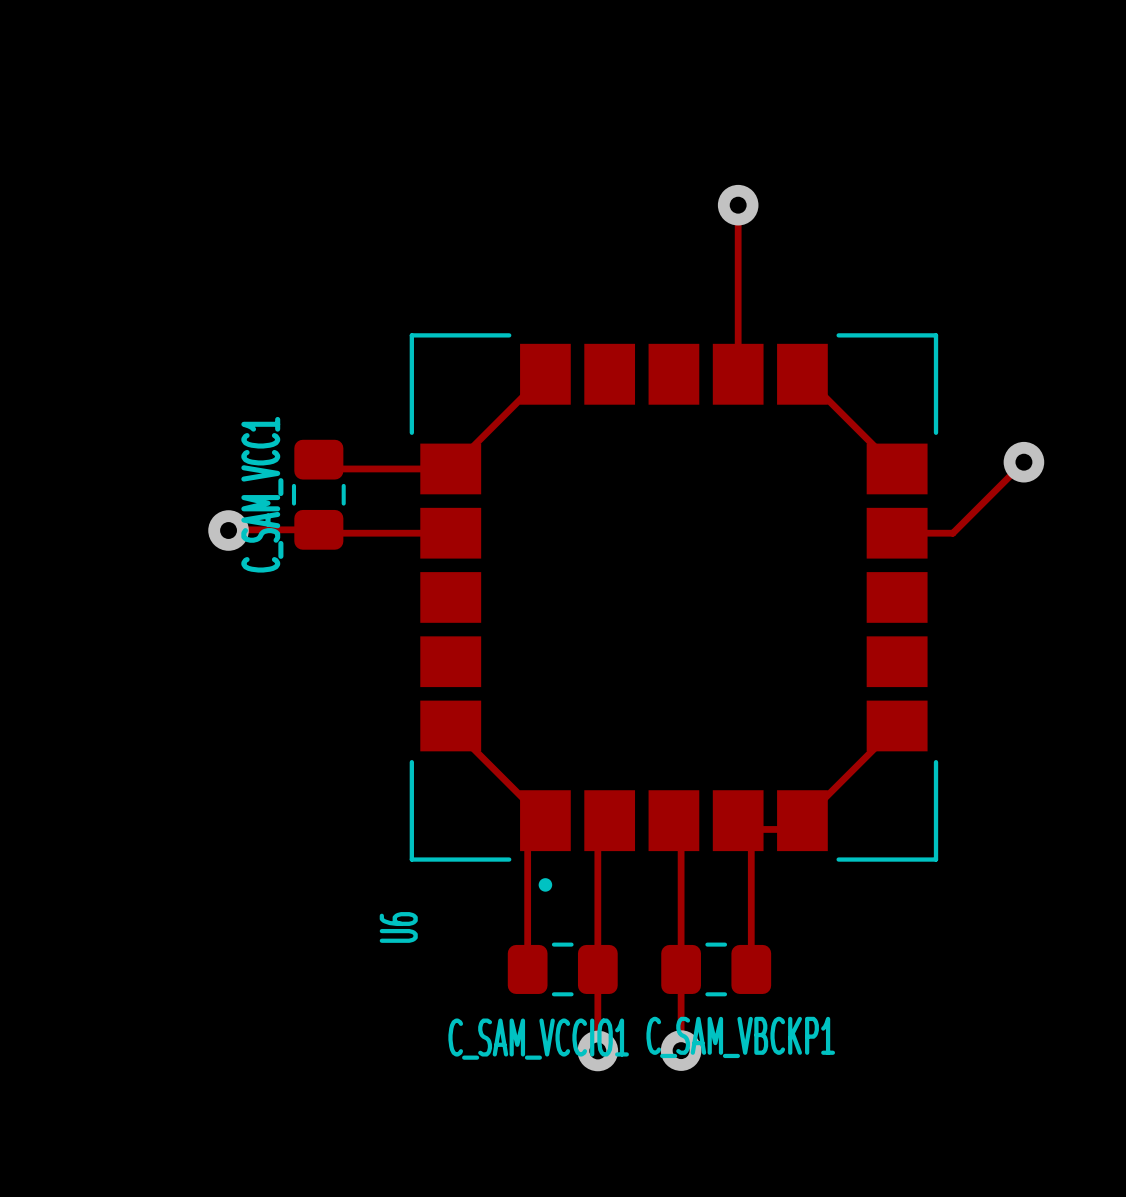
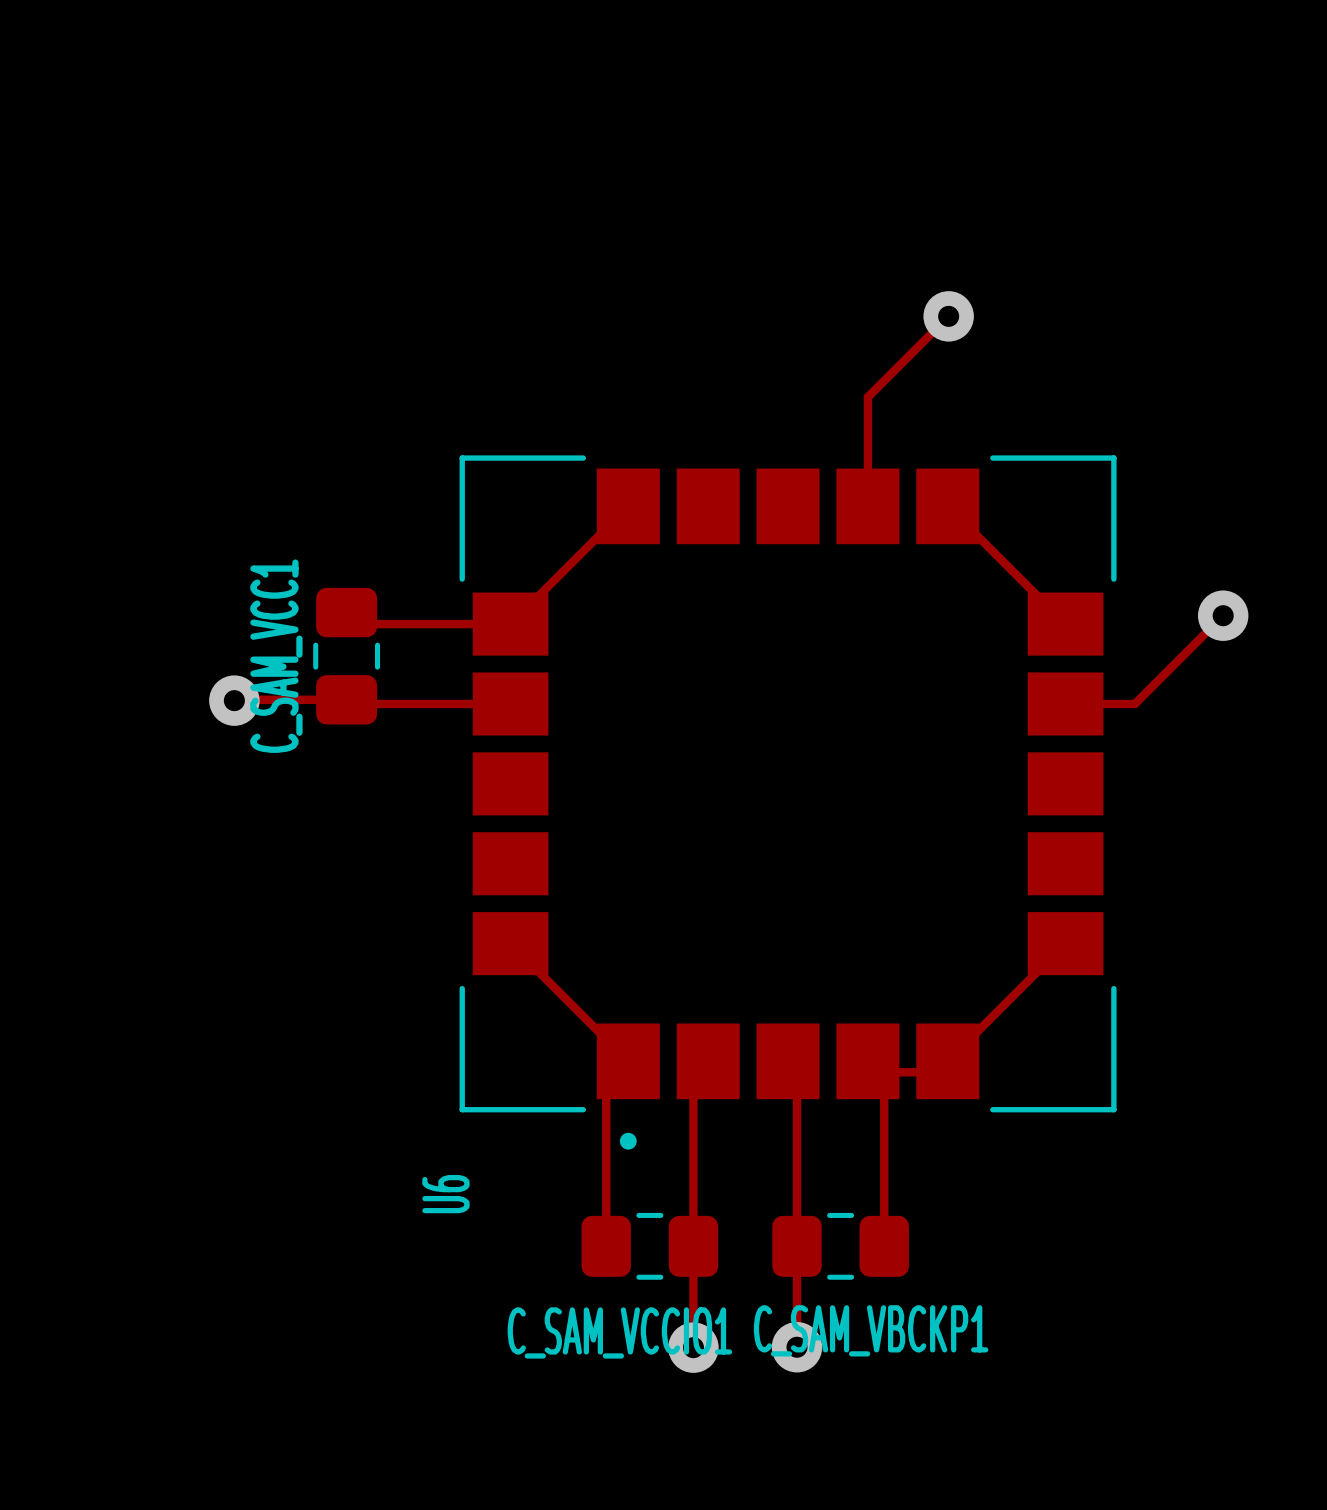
track: (738, 205) (738, 286) -> (948, 316) (867, 397)
via position: (738, 205) -> (948, 316)

